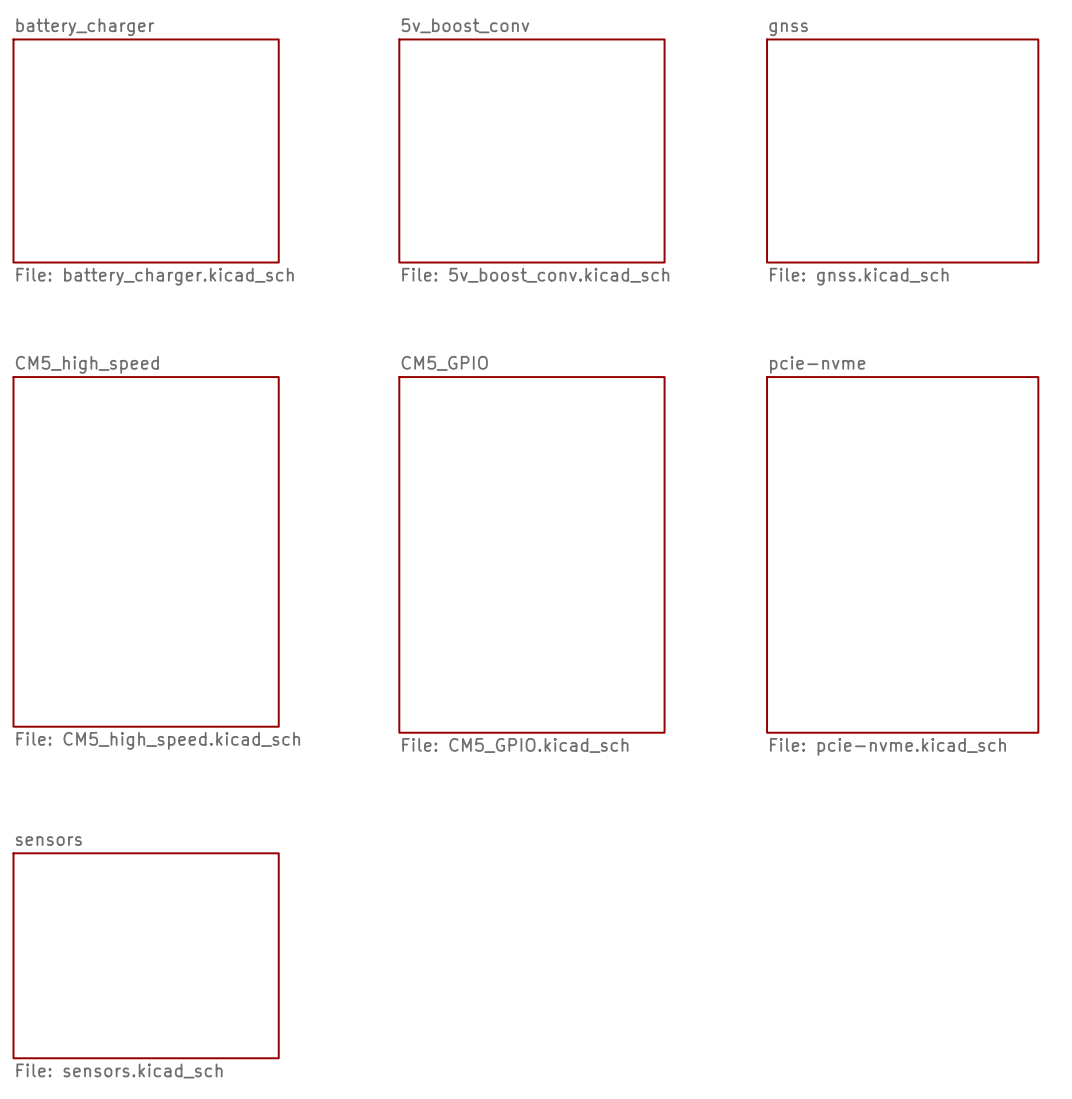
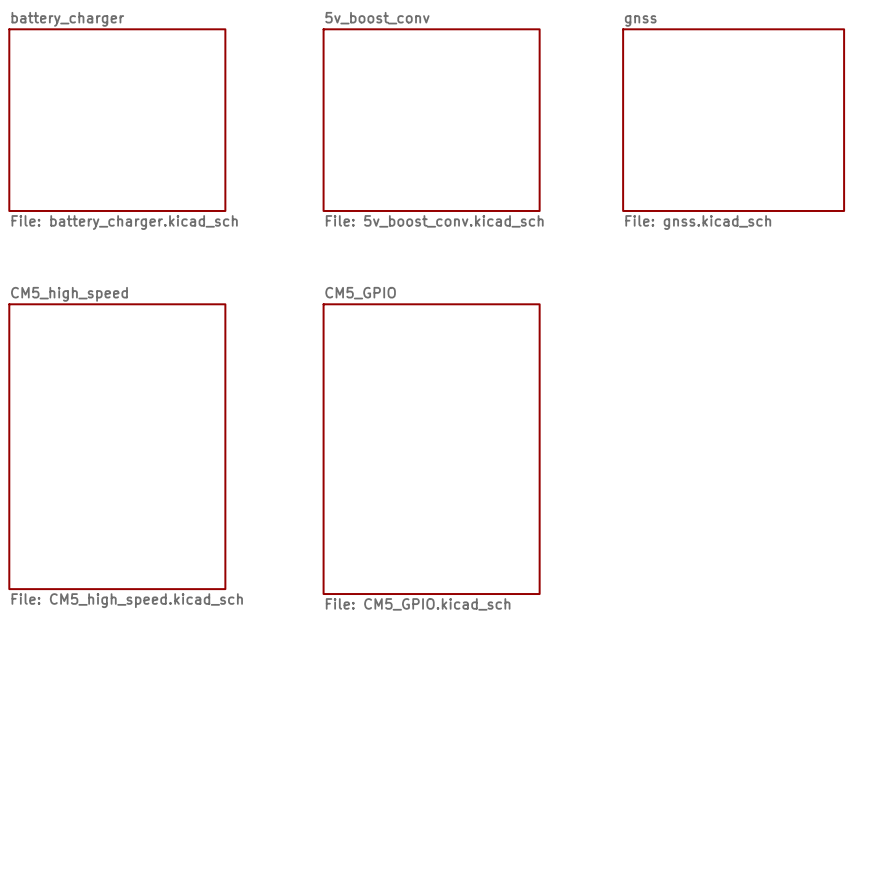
sheet pcie-nvme: File: pcie-nvme.kicad_sch (902, 554) -> none
sheet sensors: File: sensors.kicad_sch (146, 955) -> none

